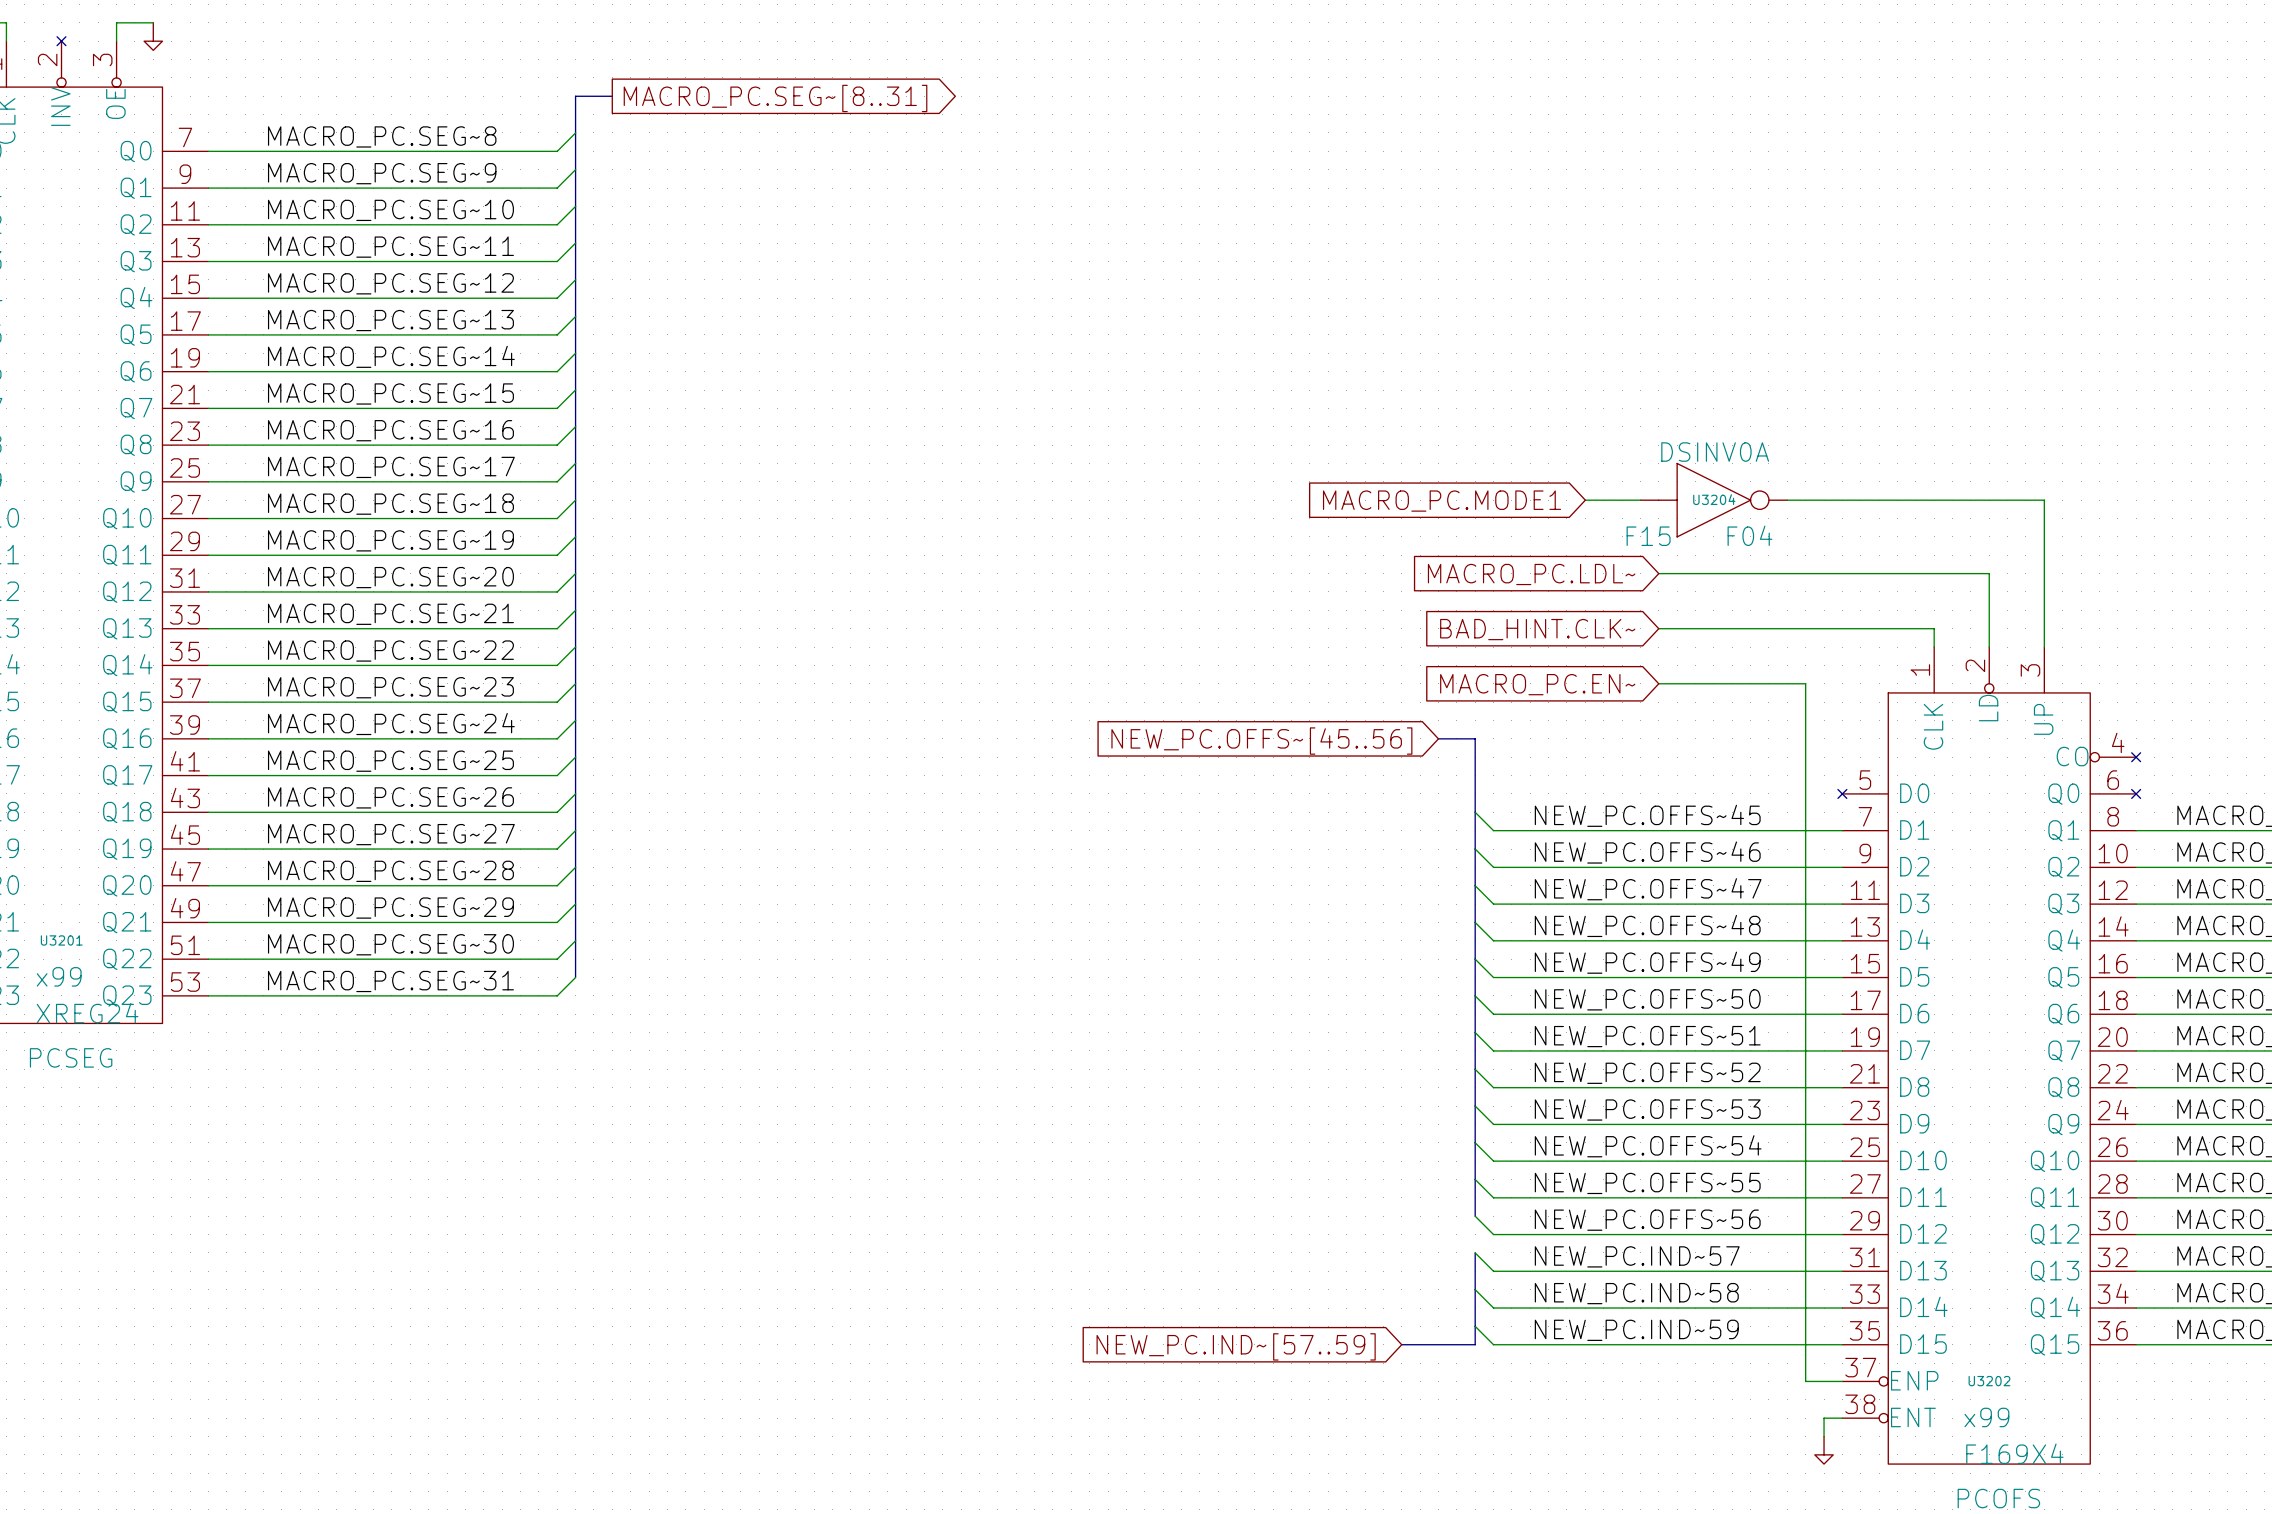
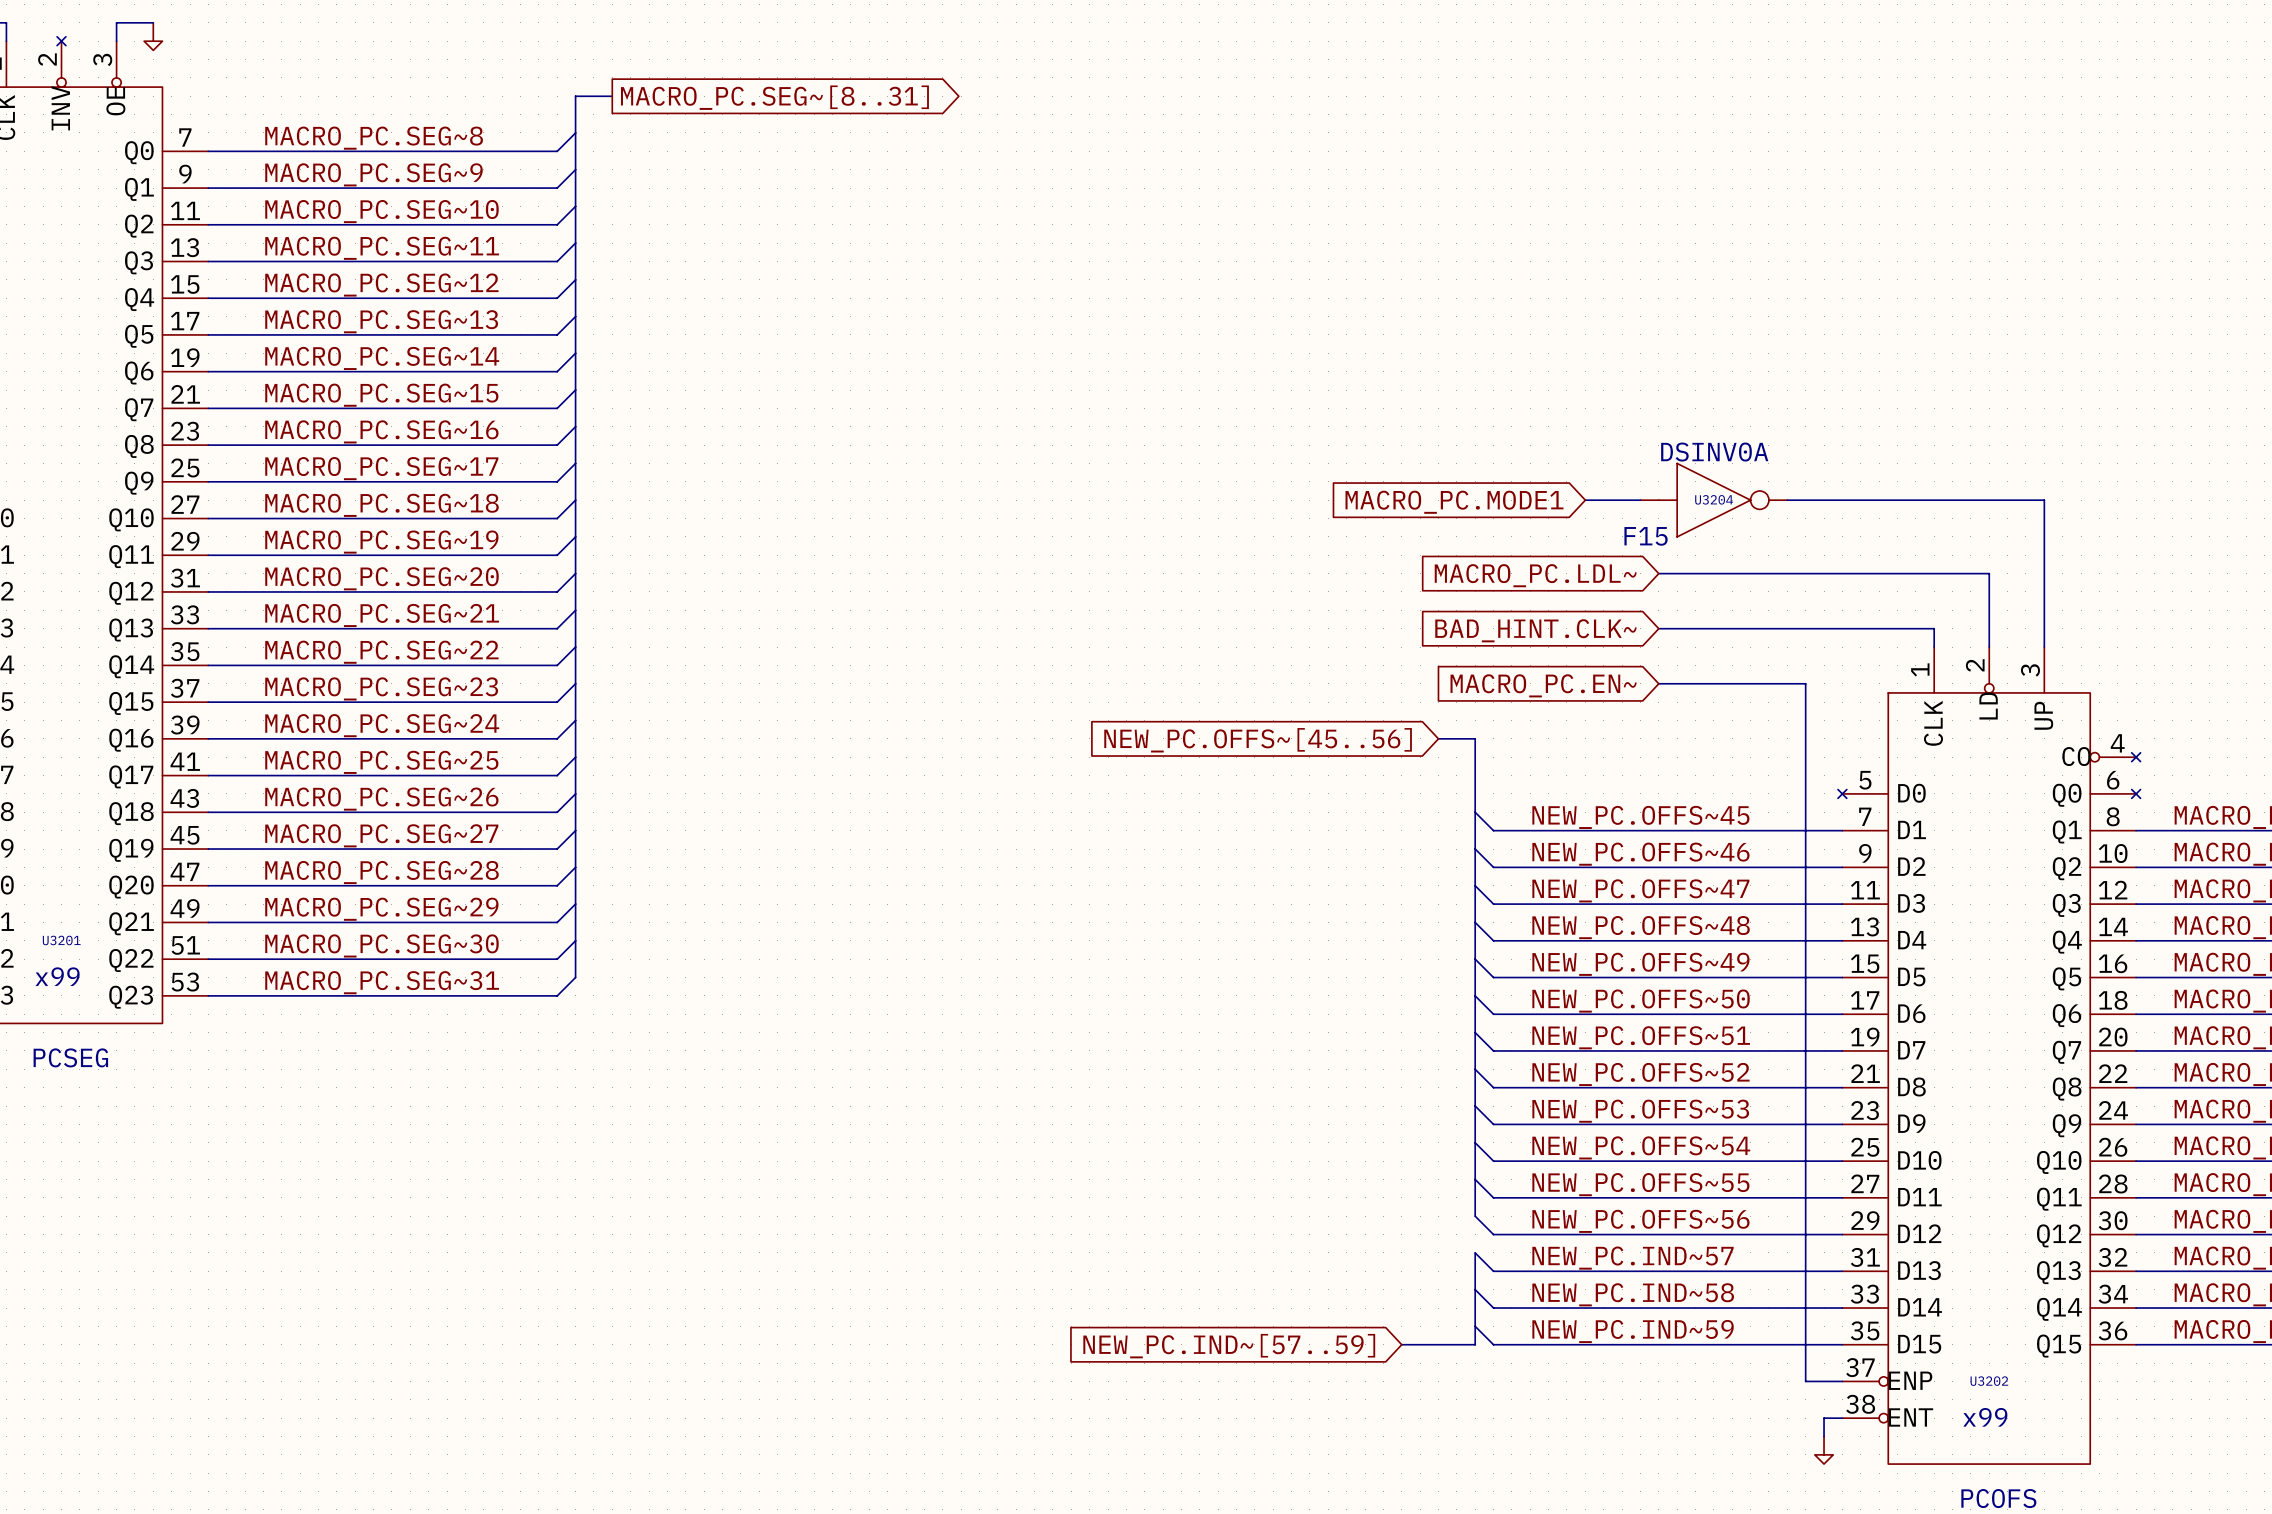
U3204 value: F04 (1750, 535) -> none
U3201 value: XREG24 (87, 1013) -> none
U3202 value: F169X4 (2014, 1453) -> none

